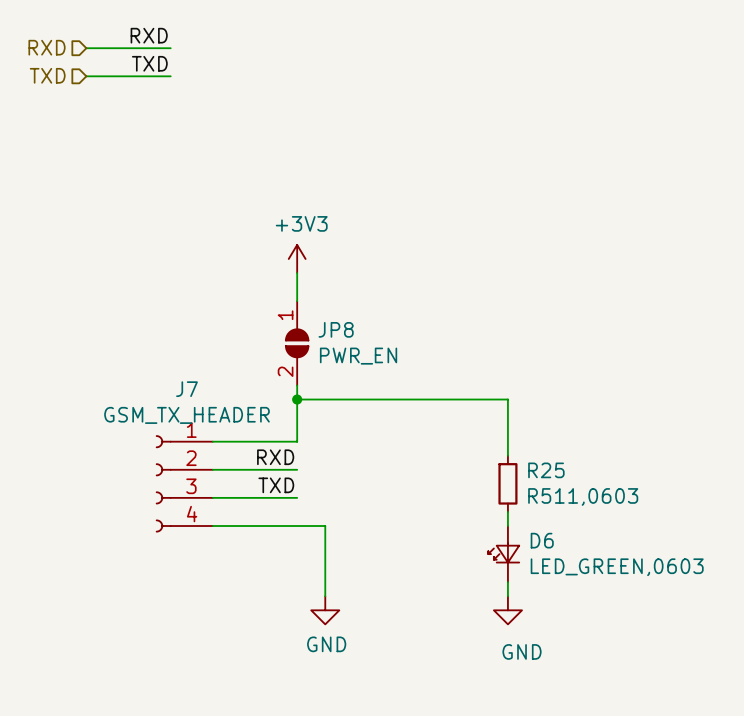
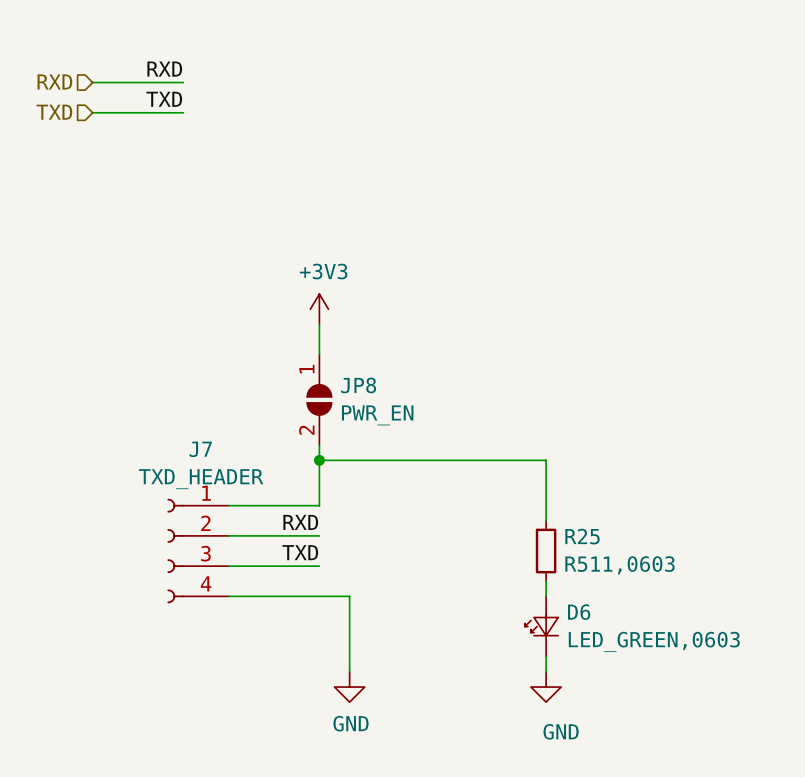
J7 value: GSM_TX_HEADER (186, 415) -> TXD_HEADER (201, 479)

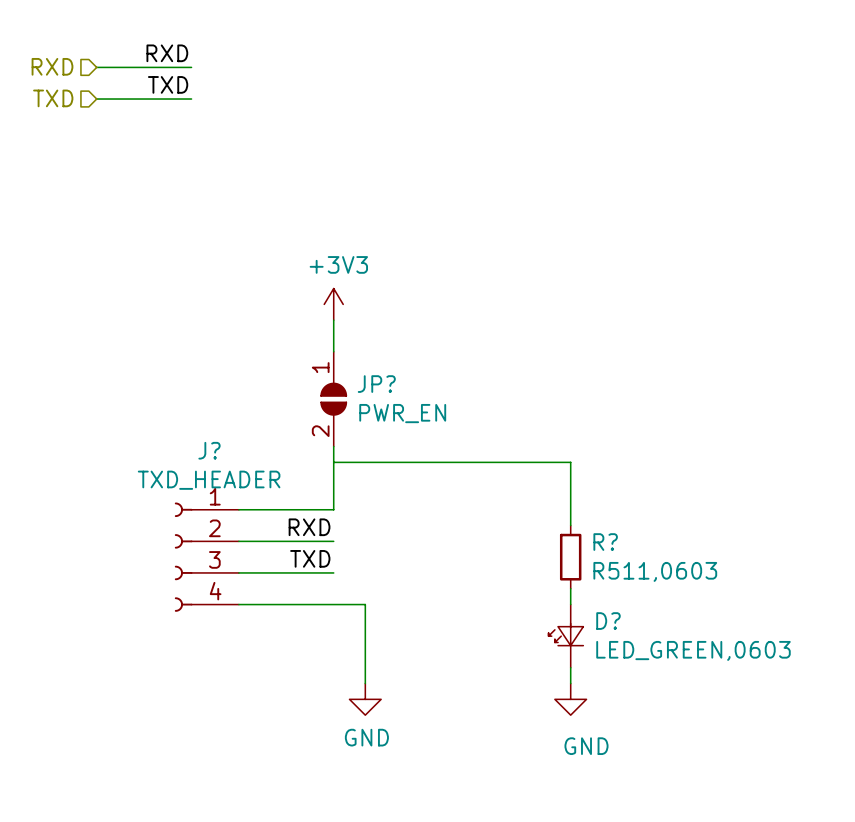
JP8 name: JP8 (358, 385) -> JP? (376, 384)
J7 name: J7 (200, 449) -> J? (209, 450)
junction: (319, 460) -> none
R25 name: R25 (582, 536) -> R? (605, 542)
D6 name: D6 (579, 612) -> D? (608, 621)

